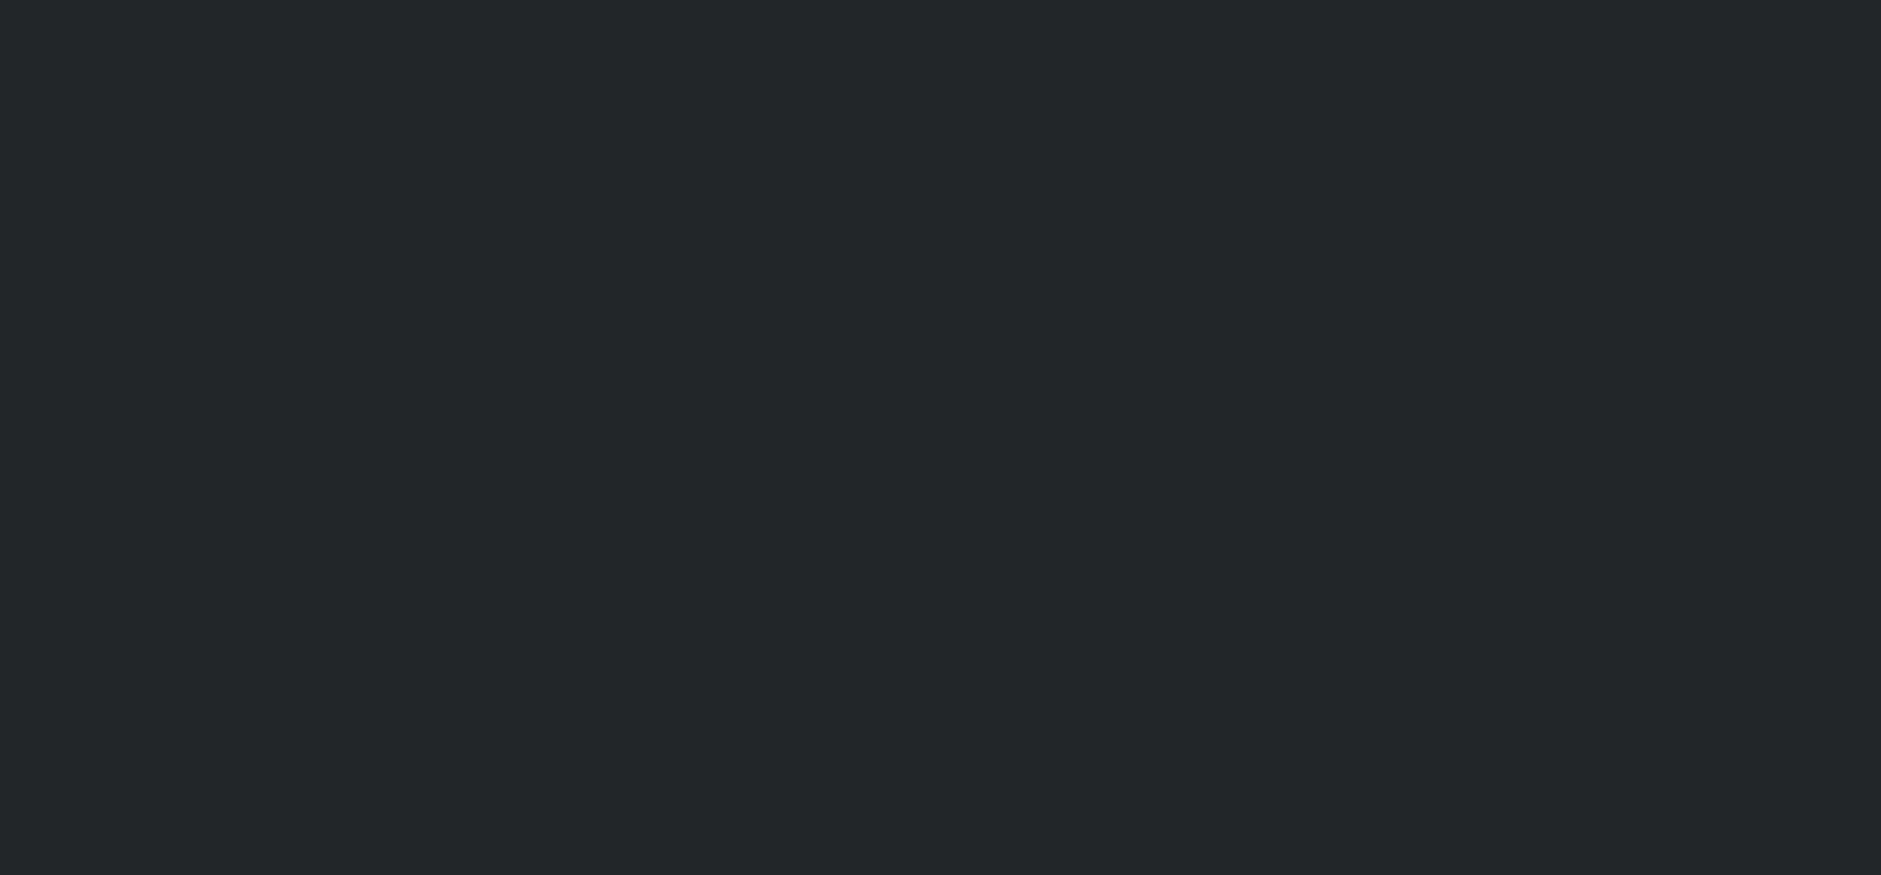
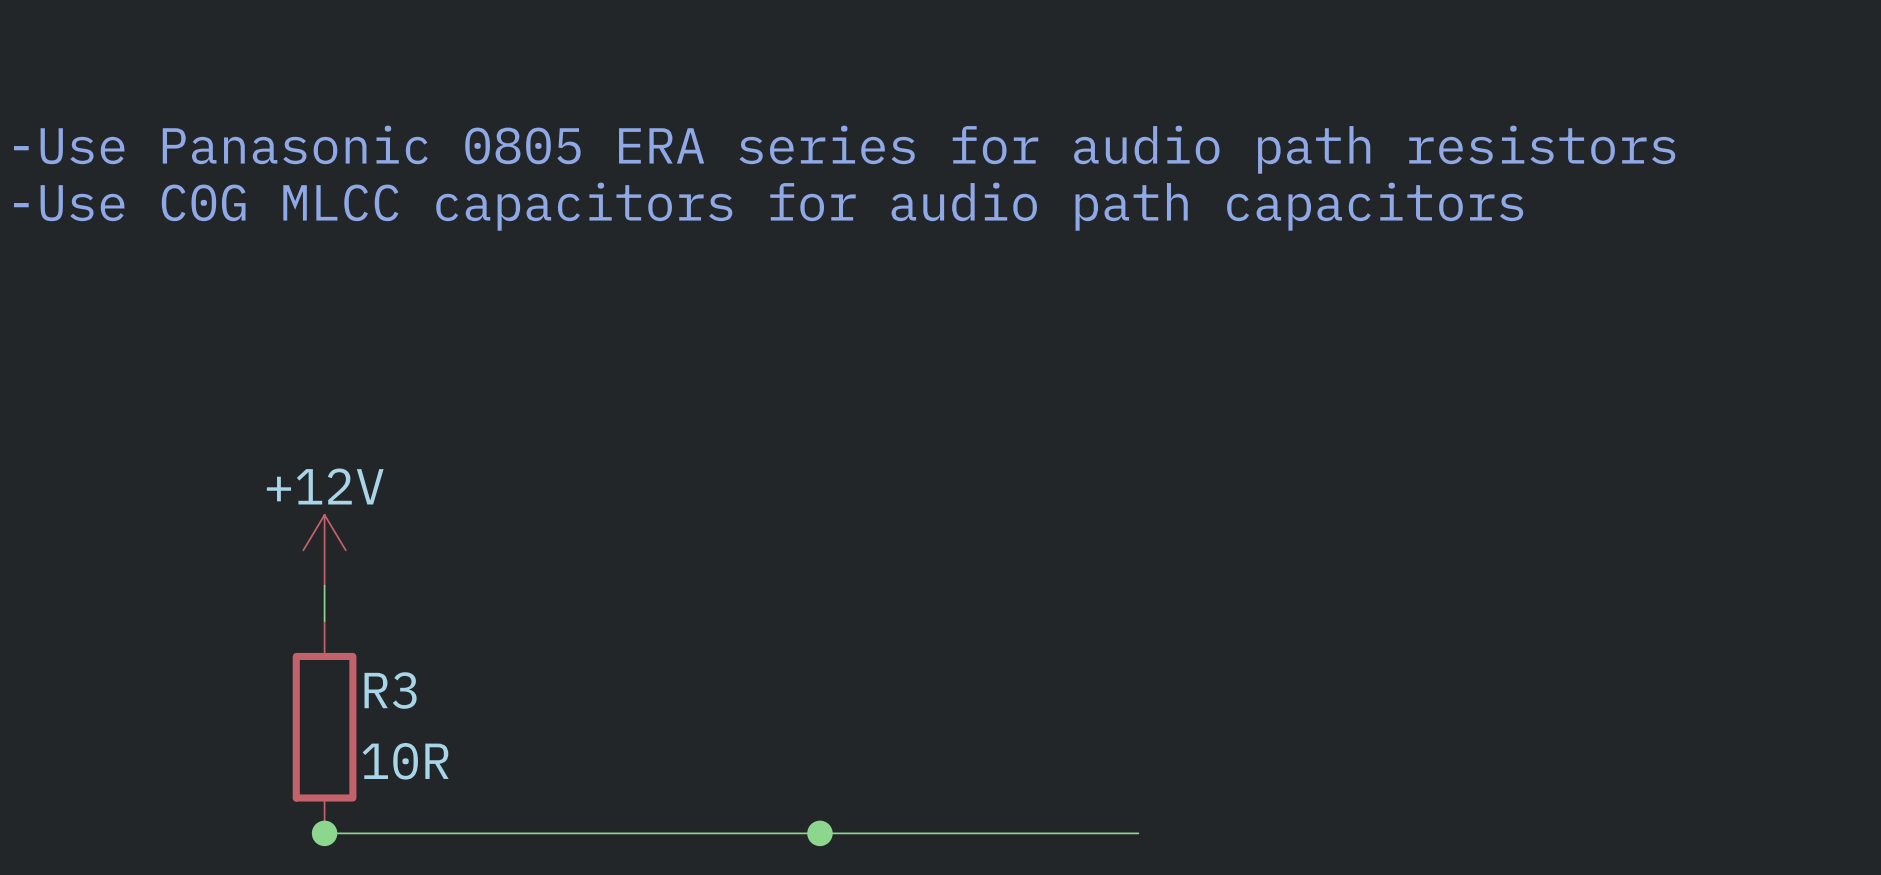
text: none -> -Use Panasonic 0805 ERA series for audio path resistors (844, 149)
text: none -> -Use C0G MLCC capacitors for audio path capacitors (768, 206)
power symbol: none -> +12V (324, 550)
wire: none -> (324, 585) (324, 621)
R3: none -> 10R (324, 727)
wire: none -> (324, 833) (1138, 833)
junction: none -> (324, 833)
junction: none -> (819, 833)

